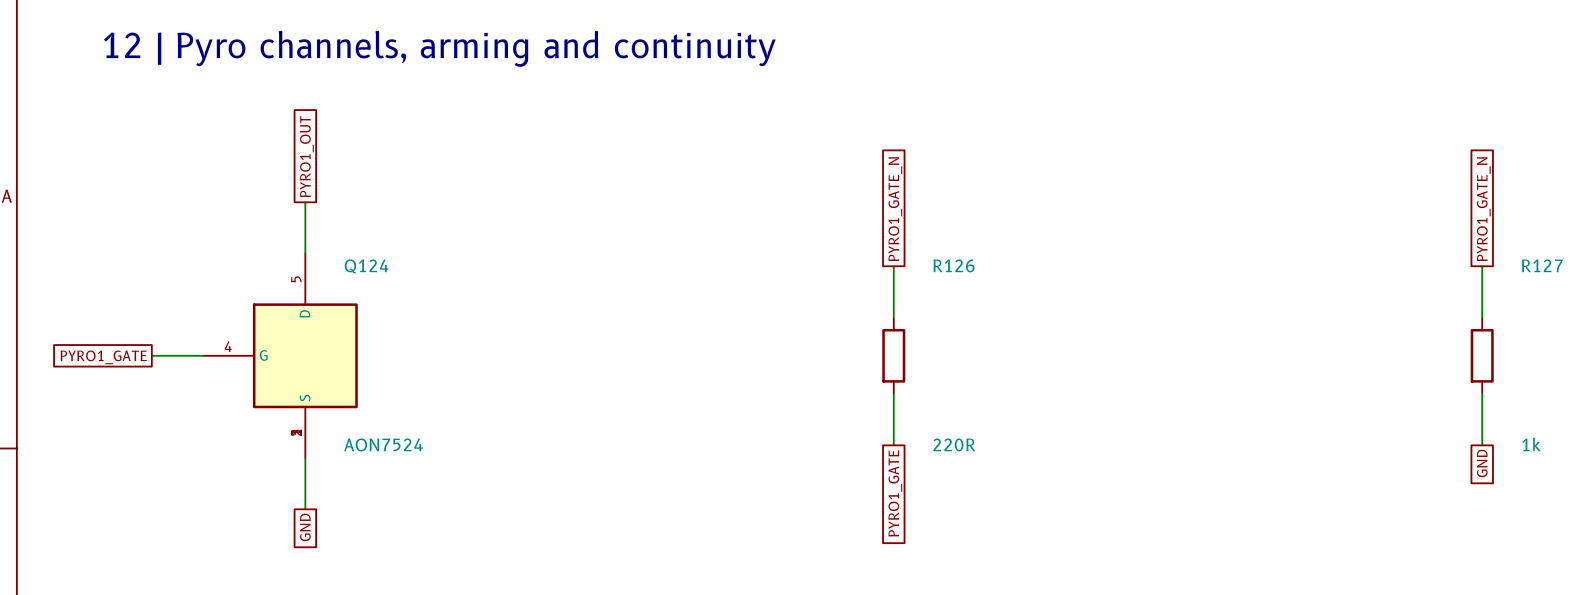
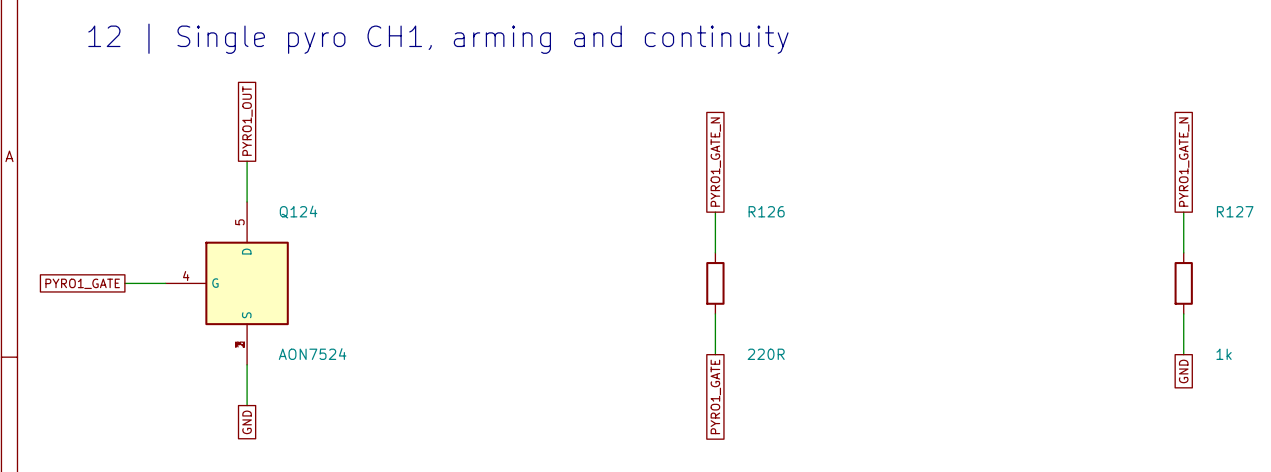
text: 12 | Pyro channels, arming and continuity (439, 48) -> 12 | Single pyro CH1, arming and continuity (438, 38)

